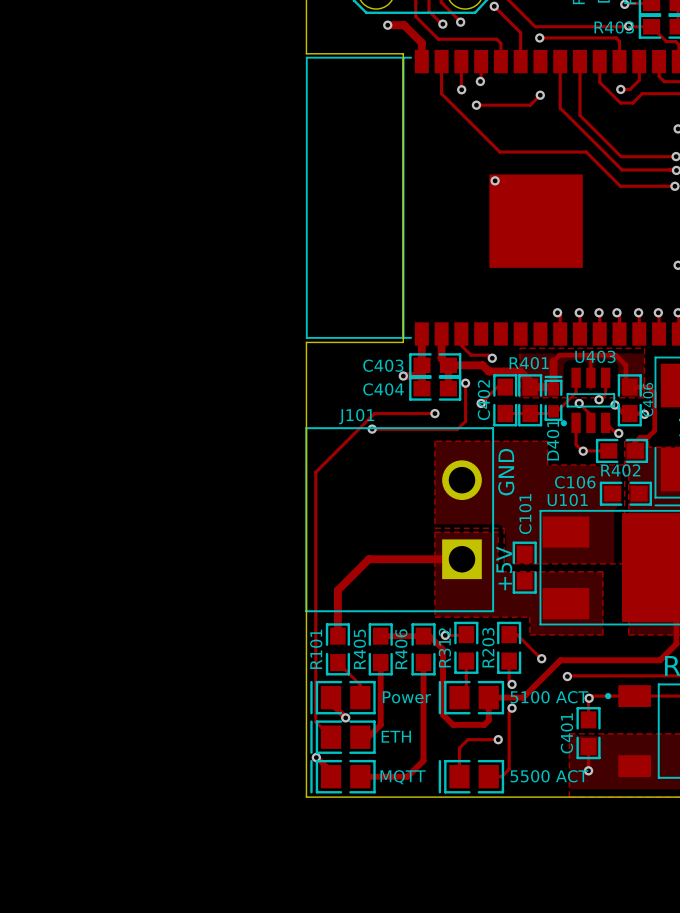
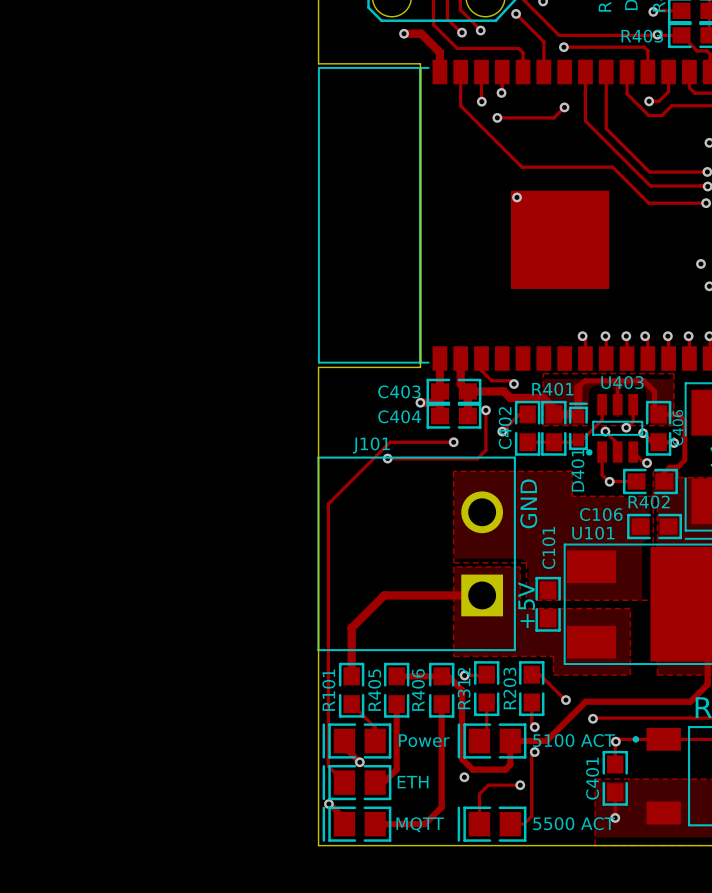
via: none -> (700, 263)
via: none -> (464, 777)

